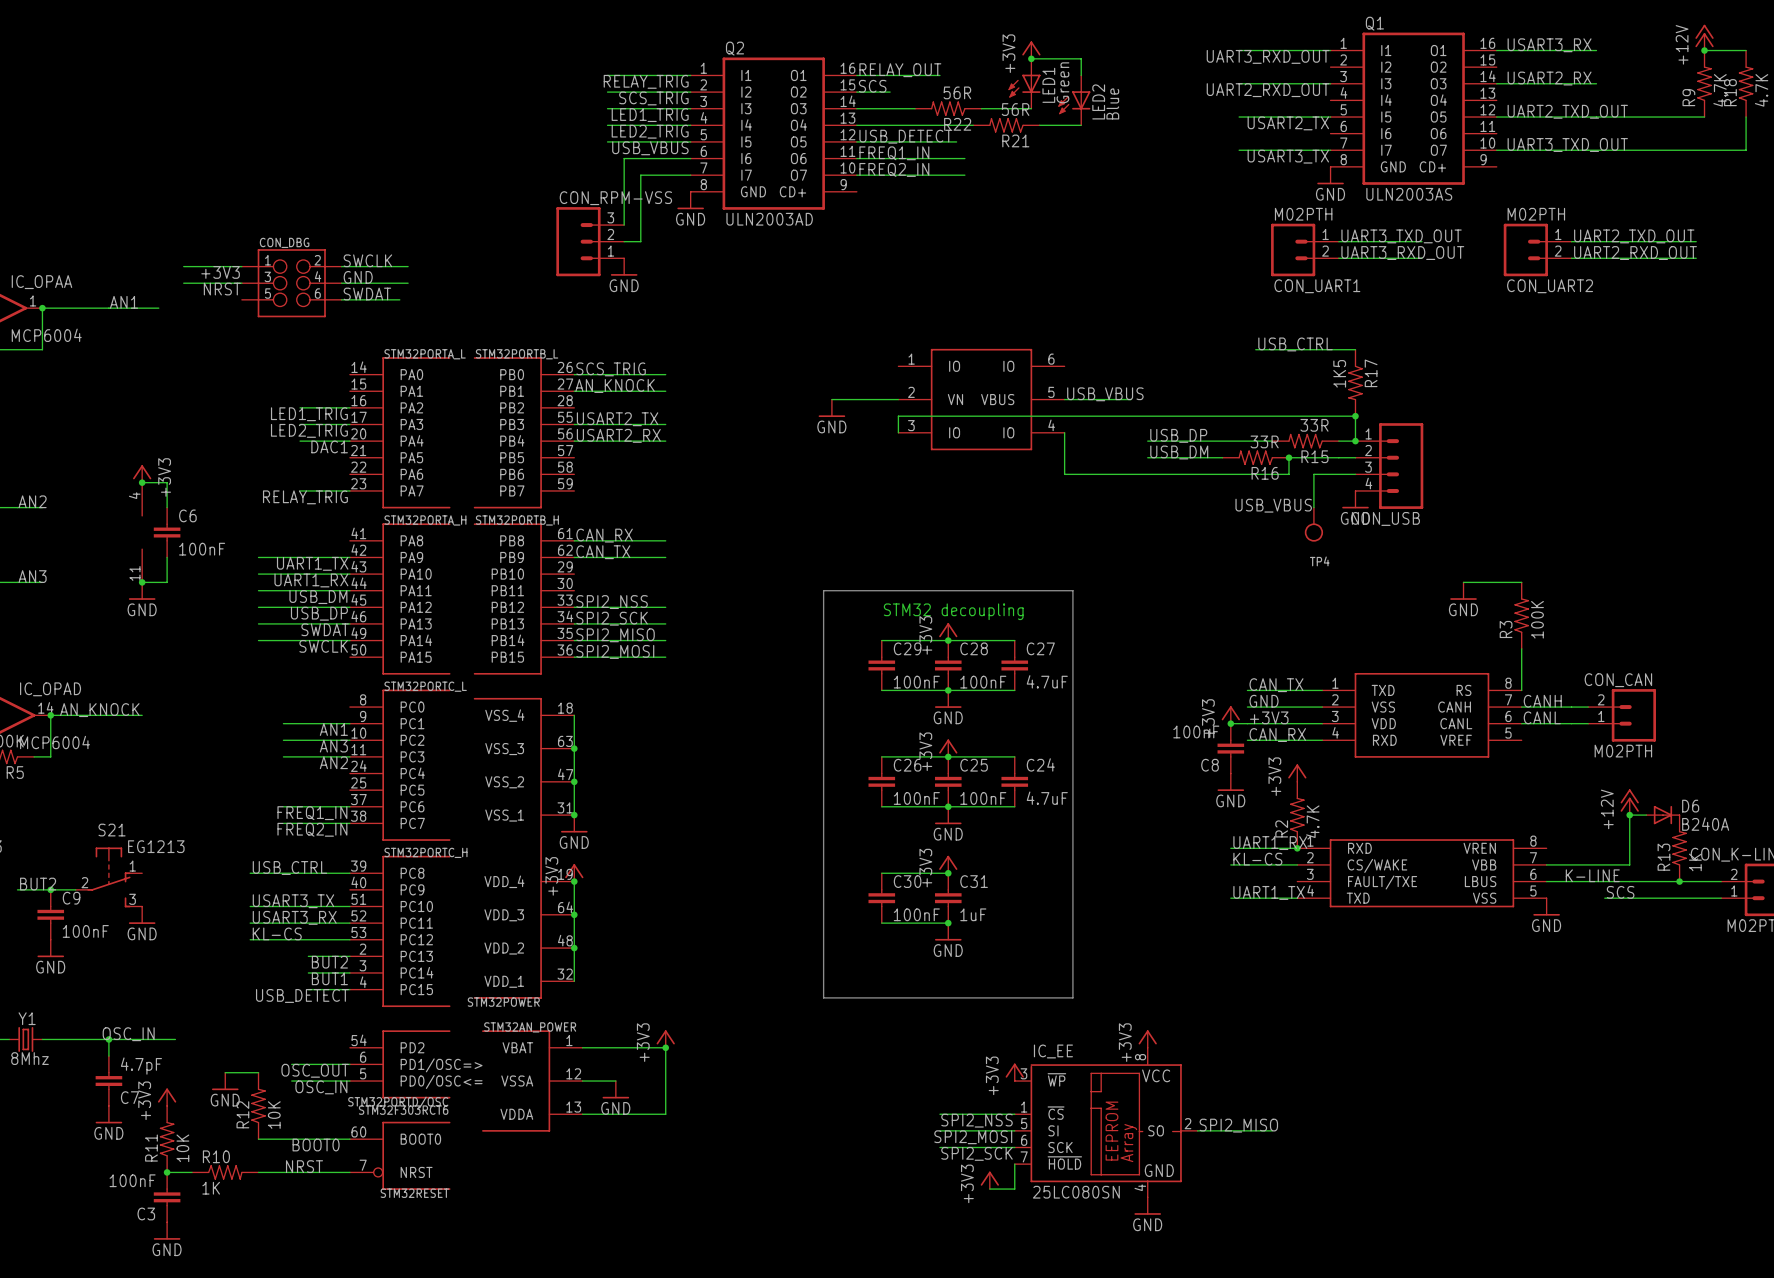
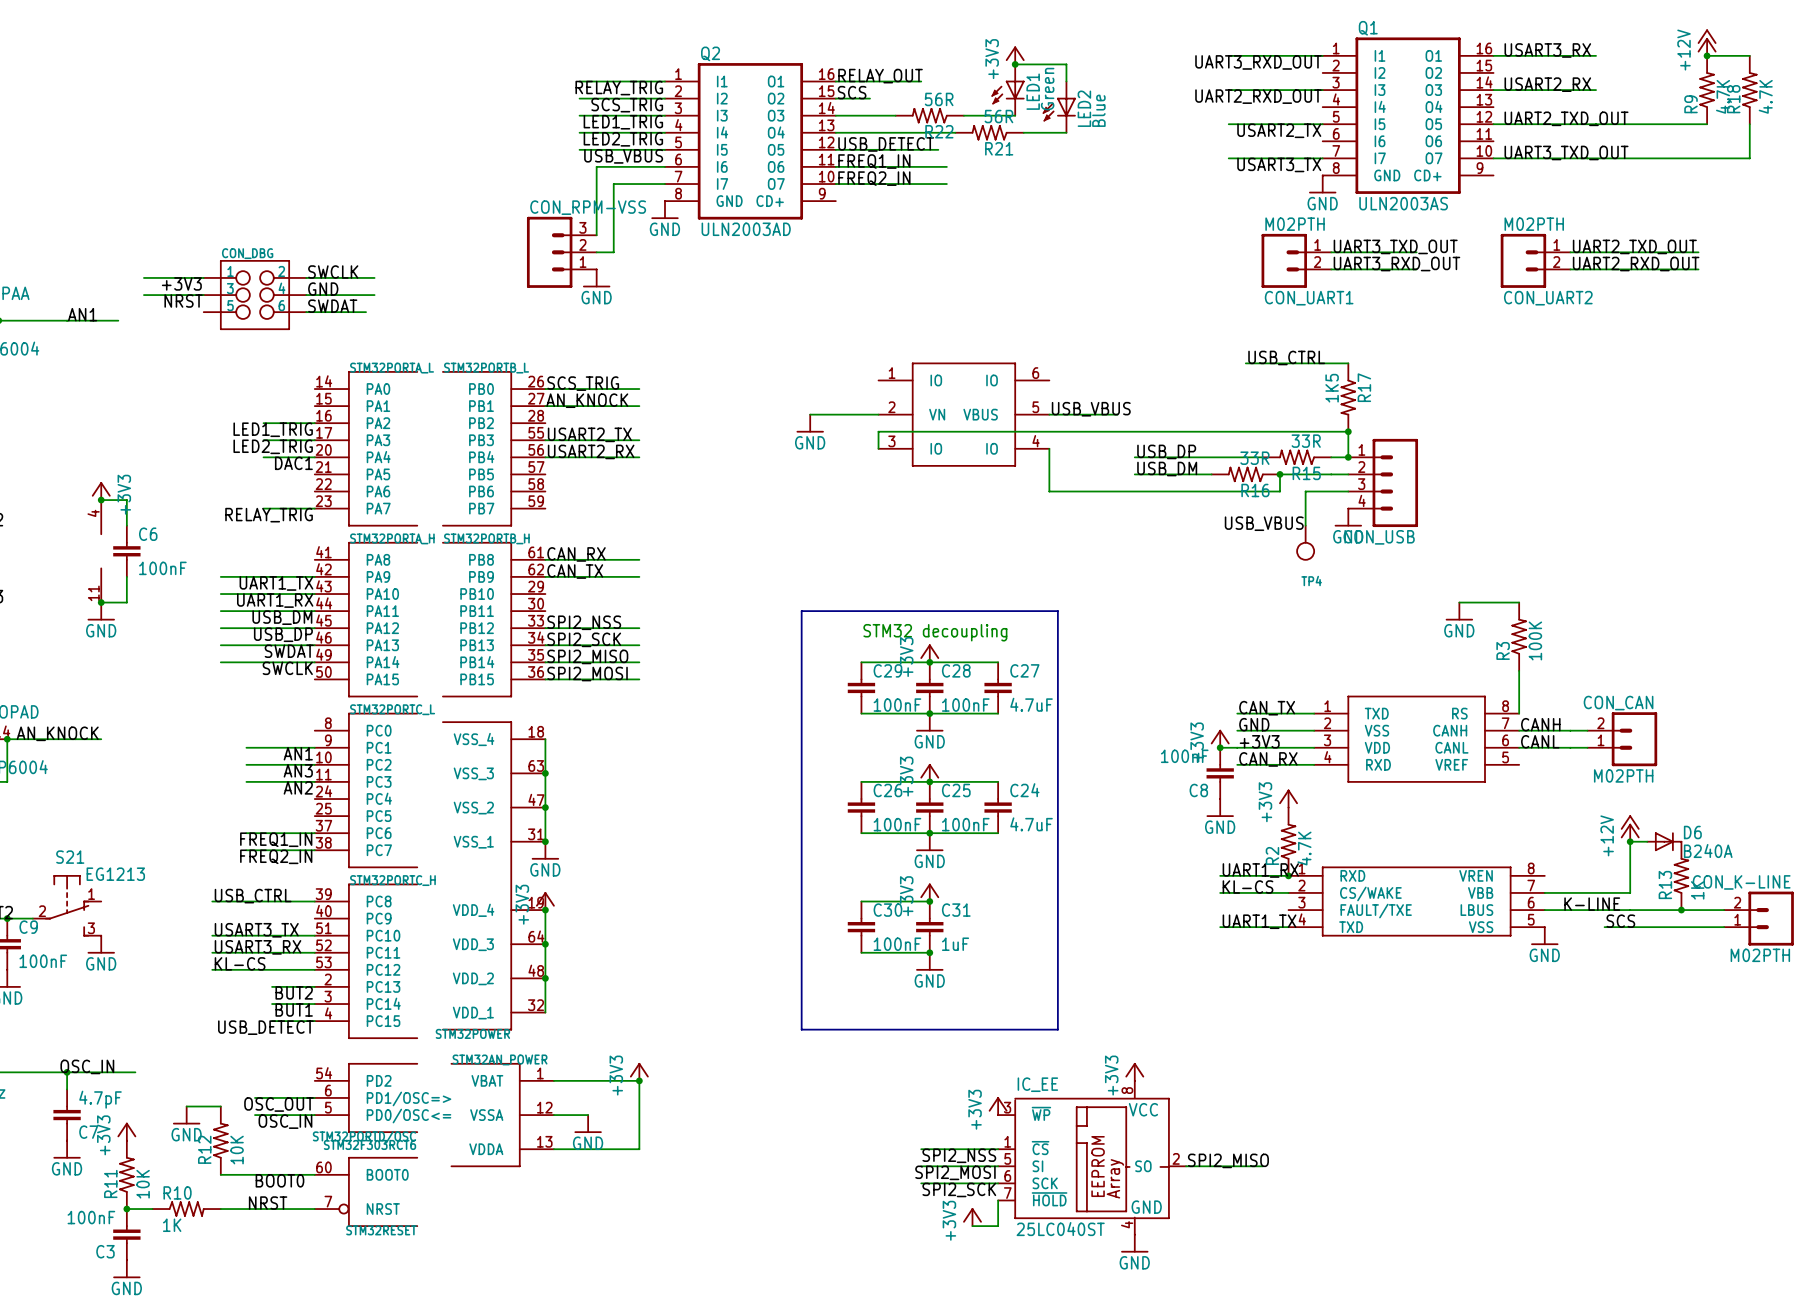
IC_EE value: 25LC080SN (1076, 1192) -> 25LC040ST (1060, 1229)

